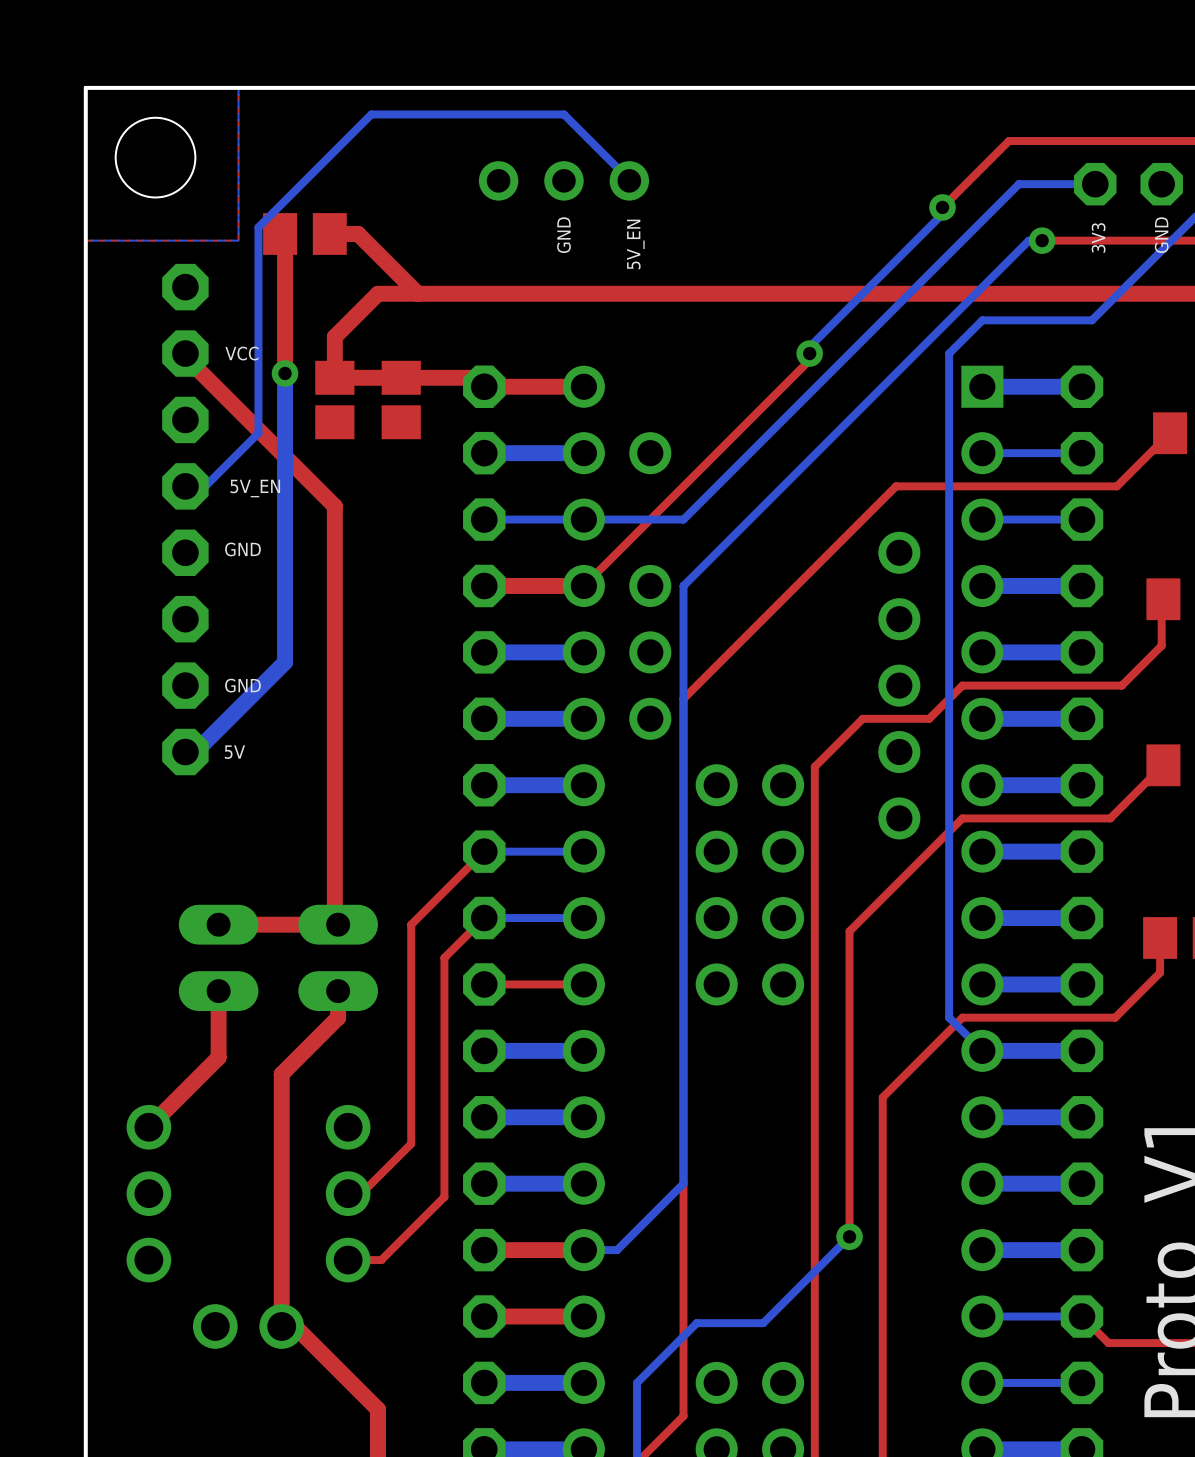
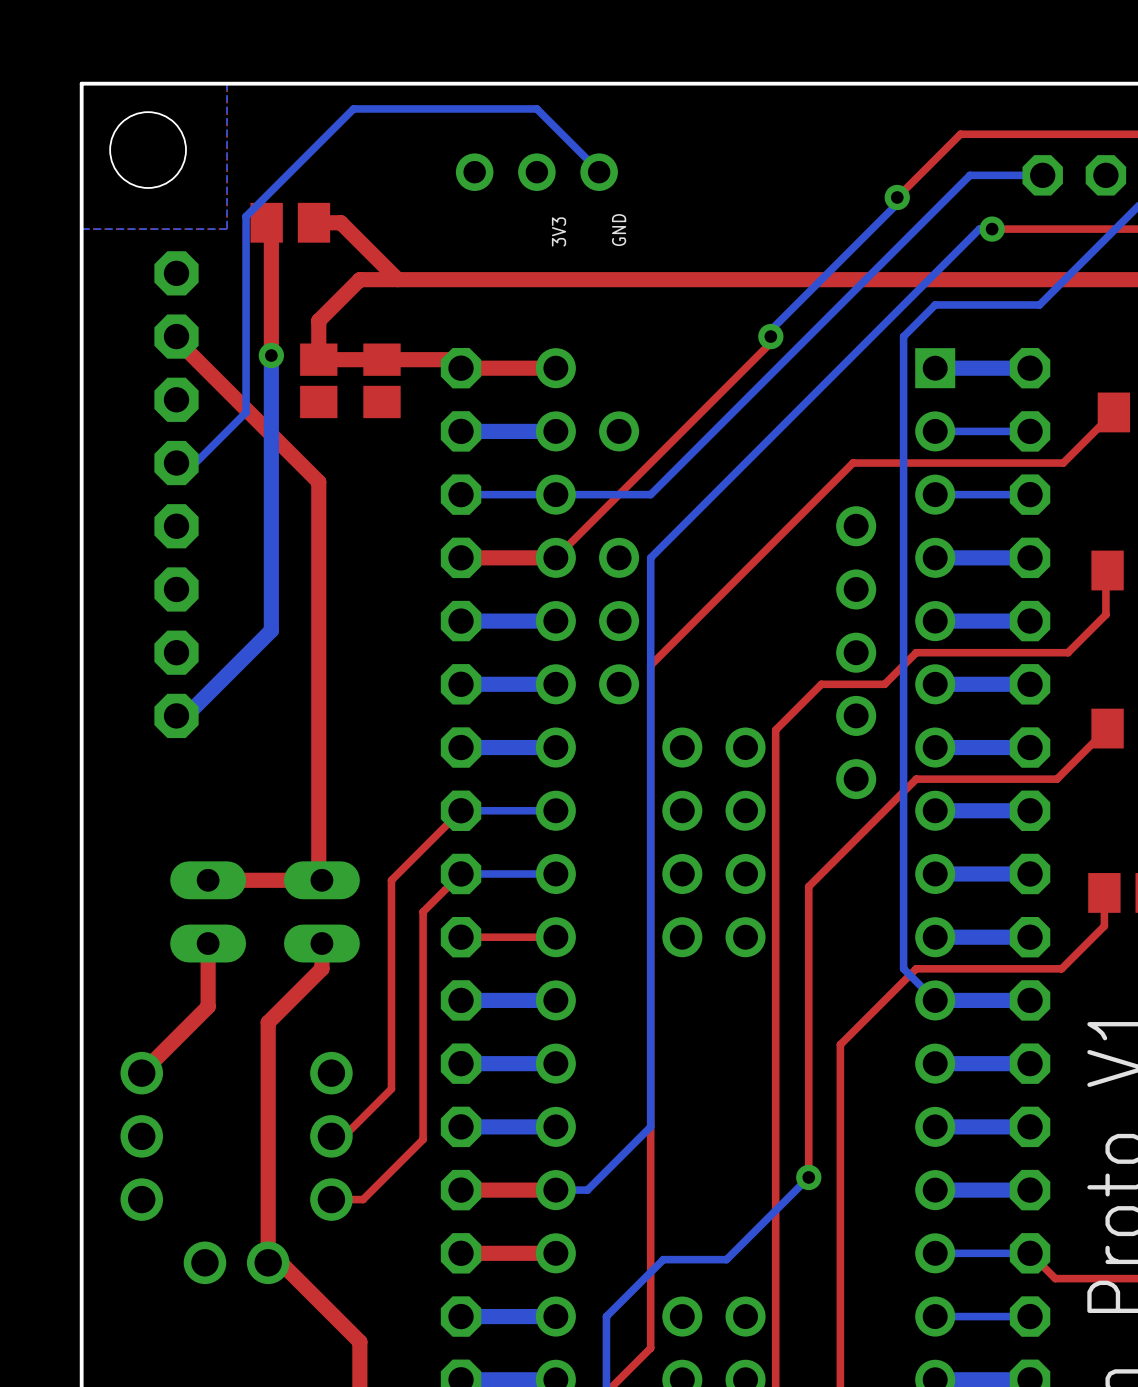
text position: GND (563, 235) -> GND (619, 230)
text: GND (1161, 235) -> none
text position: 3V3 (1098, 237) -> 3V3 (559, 231)
text: 5V_EN (635, 244) -> none
text: VCC (241, 353) -> none
text: 5V_EN (255, 488) -> none
text: GND (242, 549) -> none
text: GND (242, 685) -> none
text: 5V (234, 752) -> none

